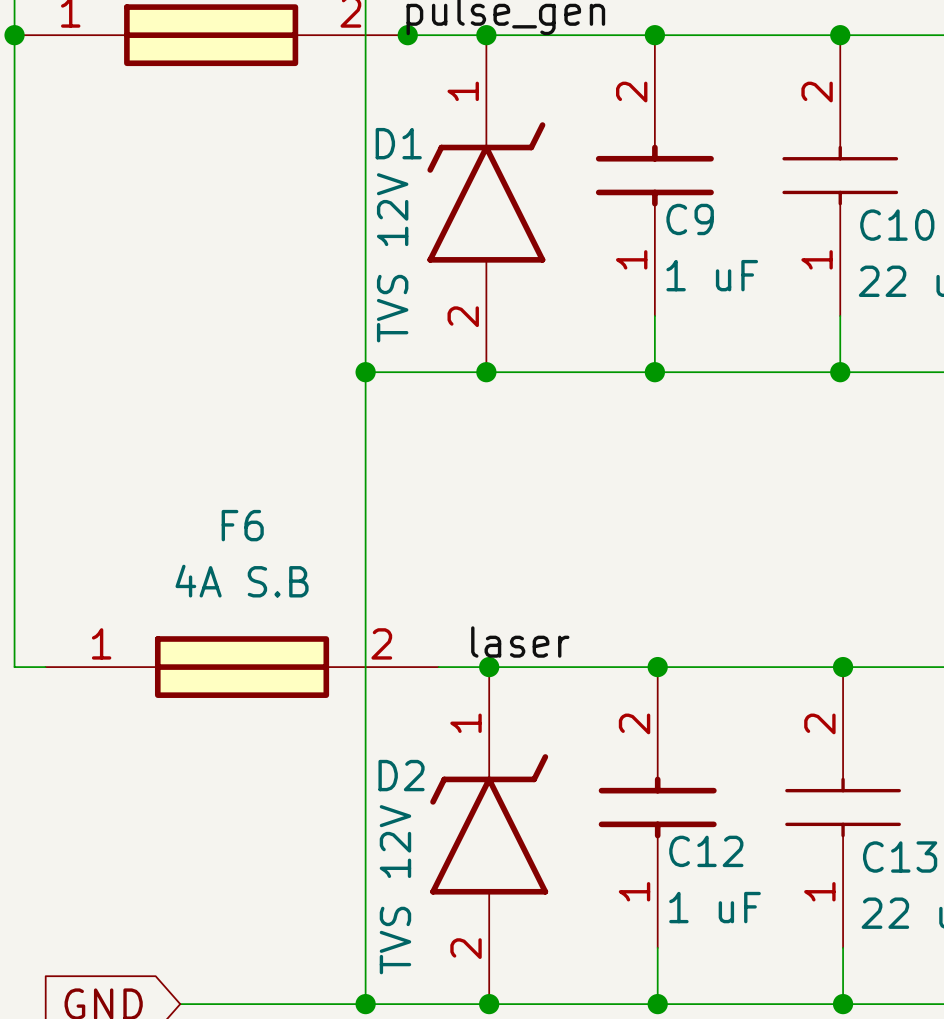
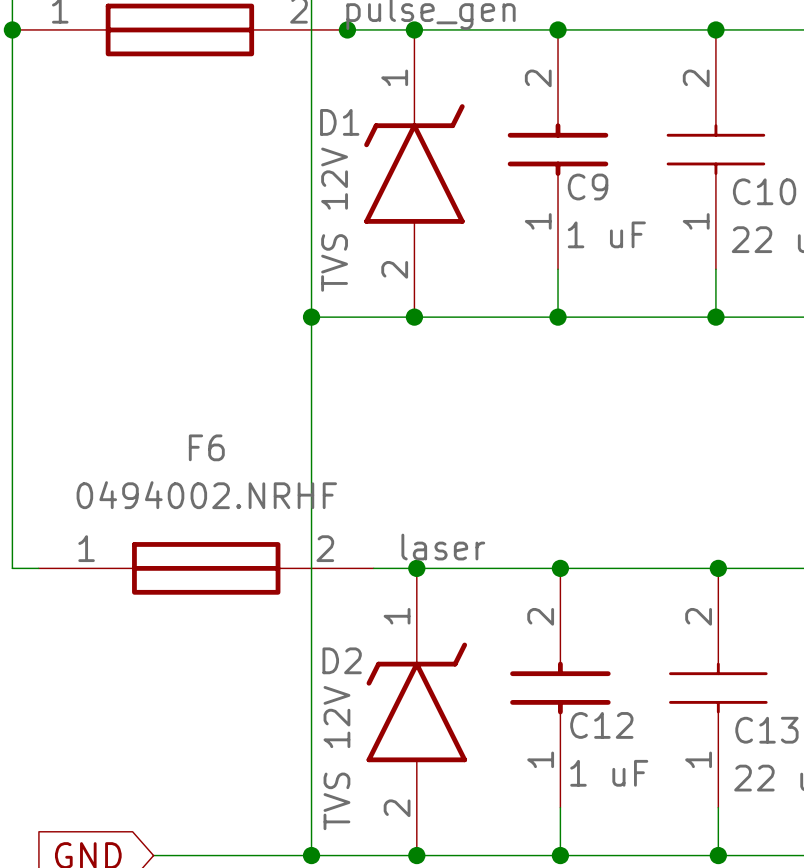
F6 value: 4A S.B (242, 581) -> 0494002.NRHF (206, 495)

